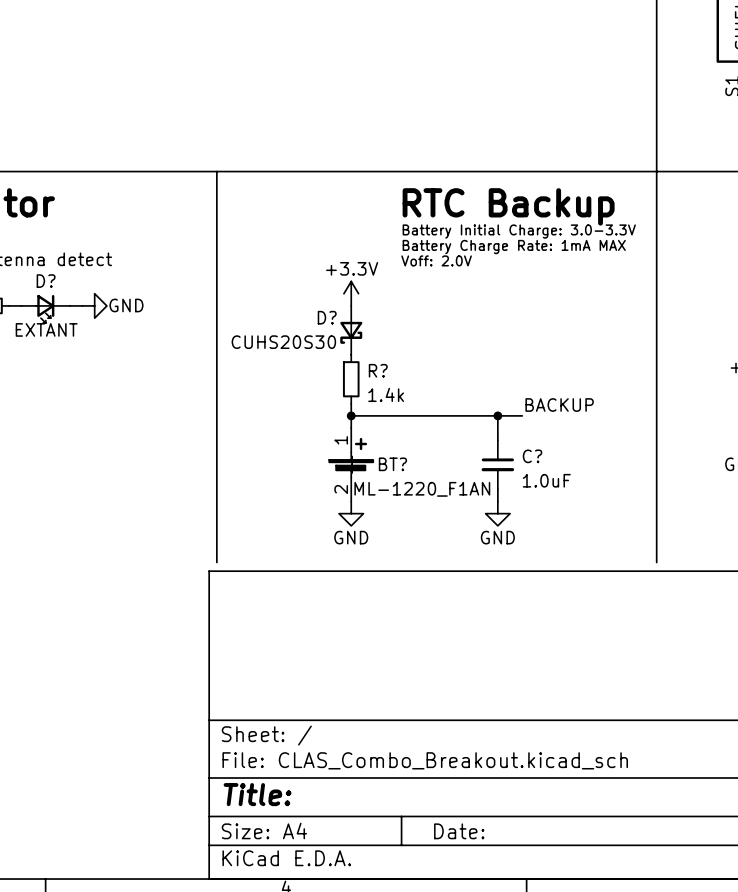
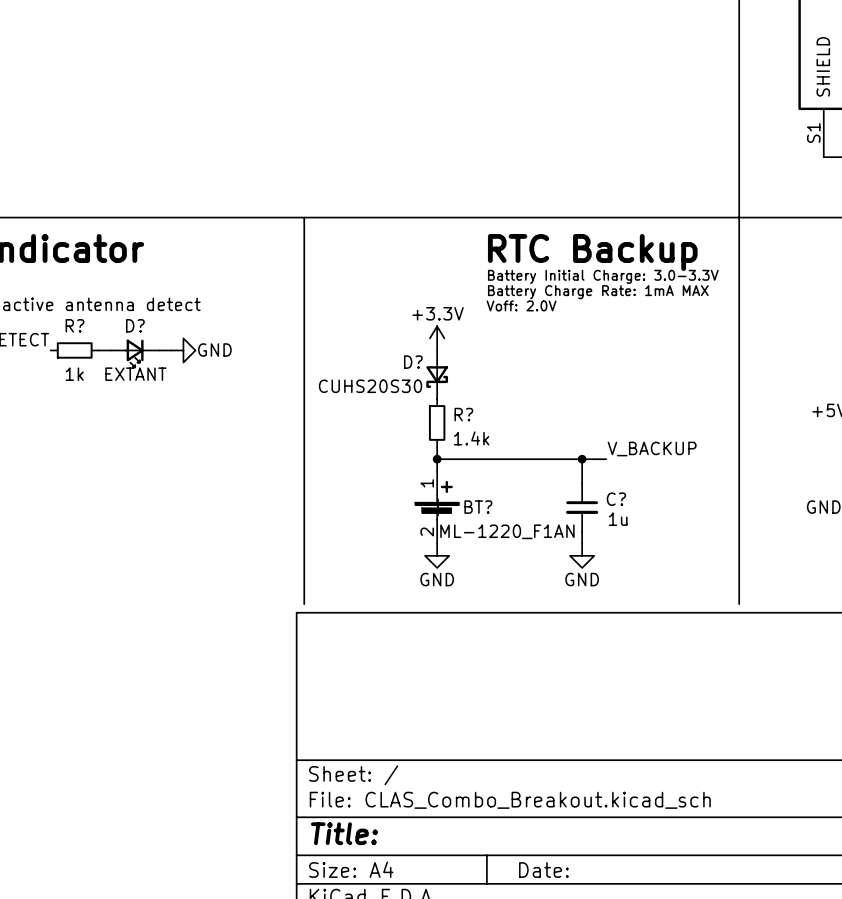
label: BACKUP (559, 405) -> V_BACKUP (652, 449)
C? value: 1.0uF (546, 480) -> 1u (618, 519)

